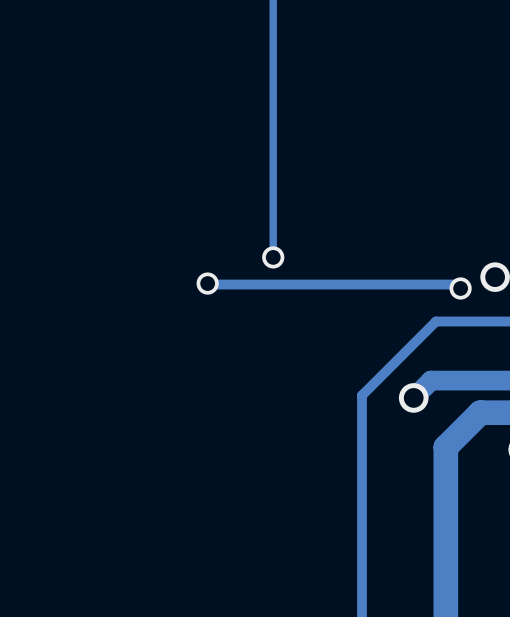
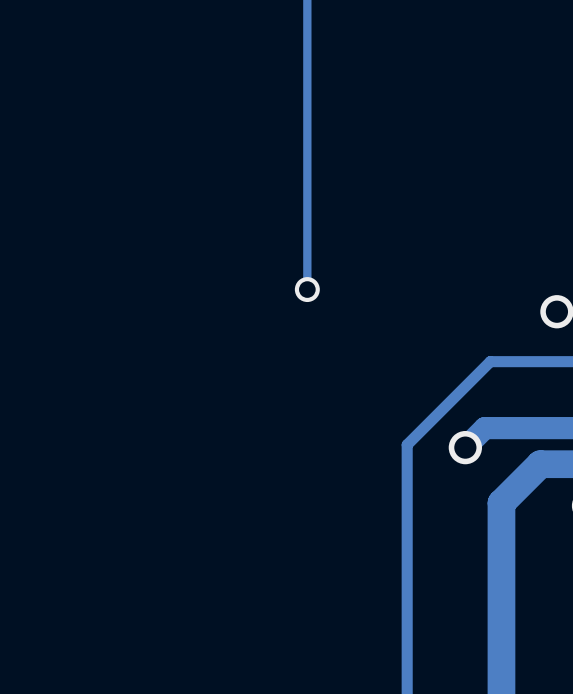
track: (207, 283) (456, 284) (460, 288) -> none
via: (207, 283) -> none
via: (460, 288) -> none

